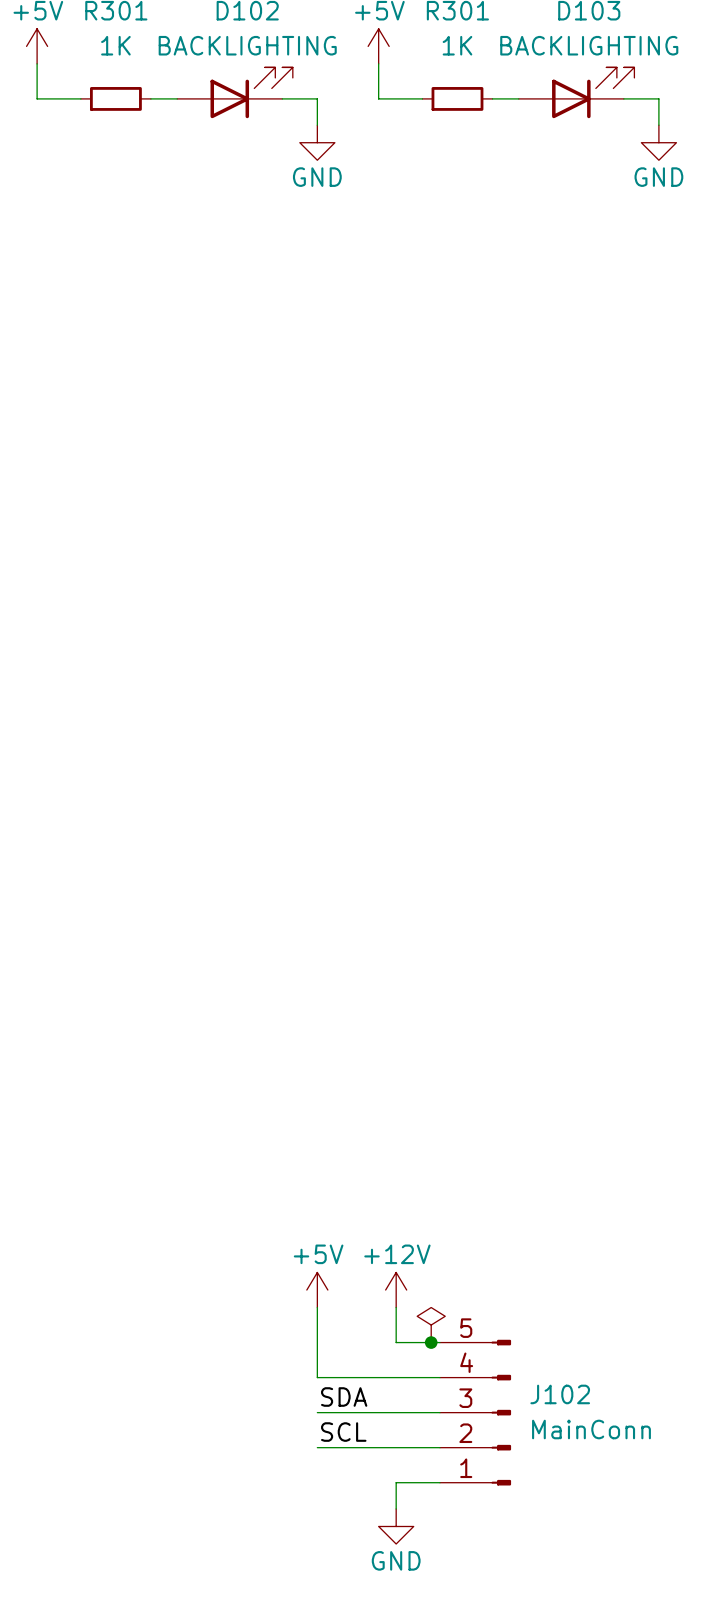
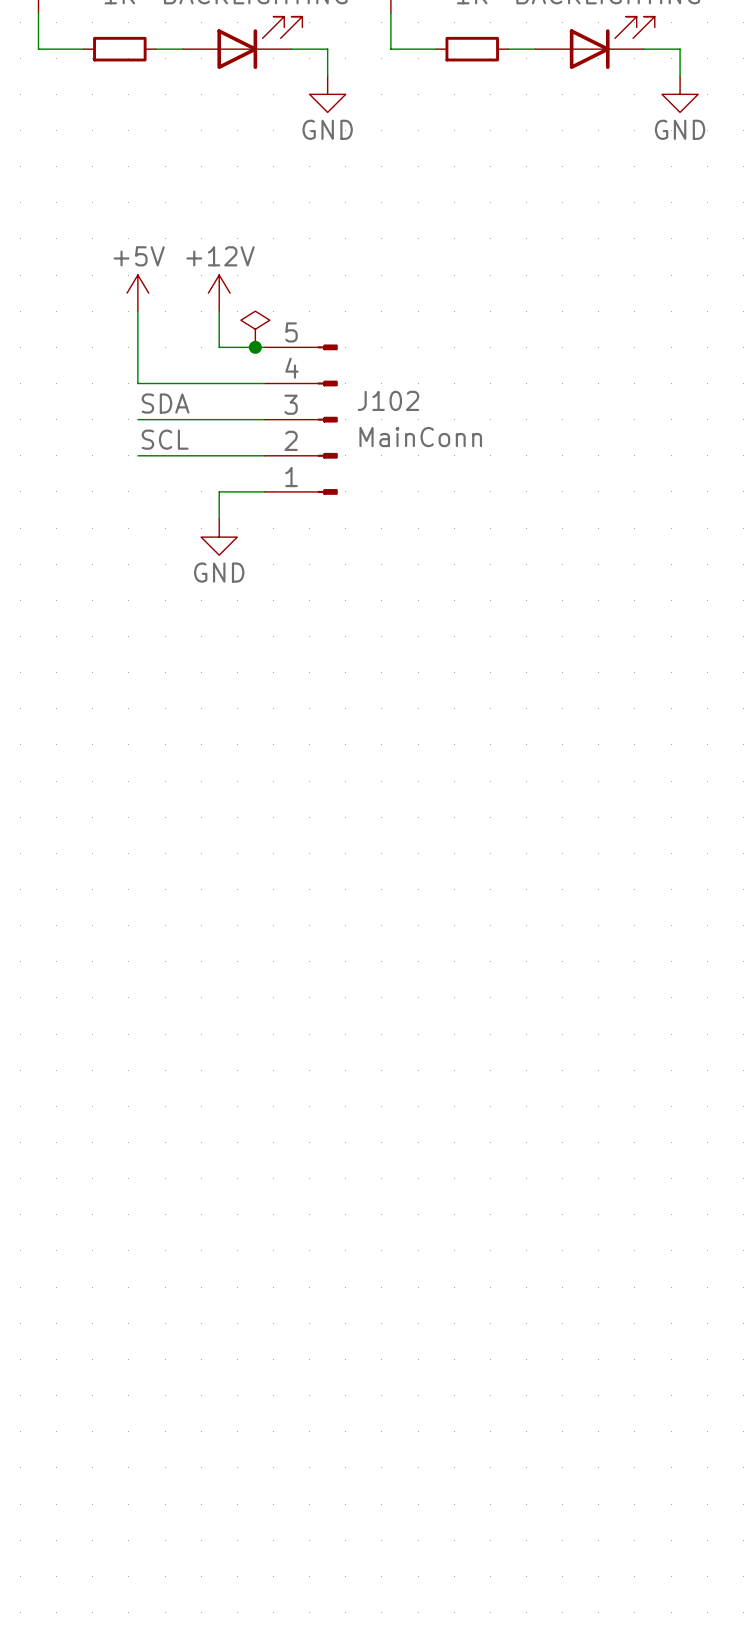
power symbol: none -> +5V (137, 293)
power symbol: none -> +12V (219, 293)
wire: none -> (137, 311) (137, 383) (264, 383)
wire: none -> (219, 311) (219, 347) (264, 347)
power symbol: none -> (255, 329)
junction: none -> (255, 347)
label: none -> SDA (165, 403)
wire: none -> (137, 419) (264, 419)
label: none -> SCL (165, 439)
wire: none -> (137, 455) (264, 455)
wire: none -> (264, 491) (219, 491) (219, 519)
power symbol: none -> GND (219, 537)
power symbol: +5V (317, 1290) -> none
power symbol: +12V (396, 1290) -> none
wire: (317, 1307) (317, 1377) (439, 1377) -> none
wire: (396, 1307) (396, 1342) (439, 1342) -> none
power symbol: (431, 1325) -> none
junction: (431, 1342) -> none
label: SDA (344, 1397) -> none
wire: (317, 1412) (439, 1412) -> none
J102 position: (475, 1412) -> (301, 419)
label: SCL (343, 1432) -> none
wire: (317, 1447) (439, 1447) -> none
wire: (439, 1482) (396, 1482) (396, 1508) -> none
power symbol: GND (396, 1526) -> none

